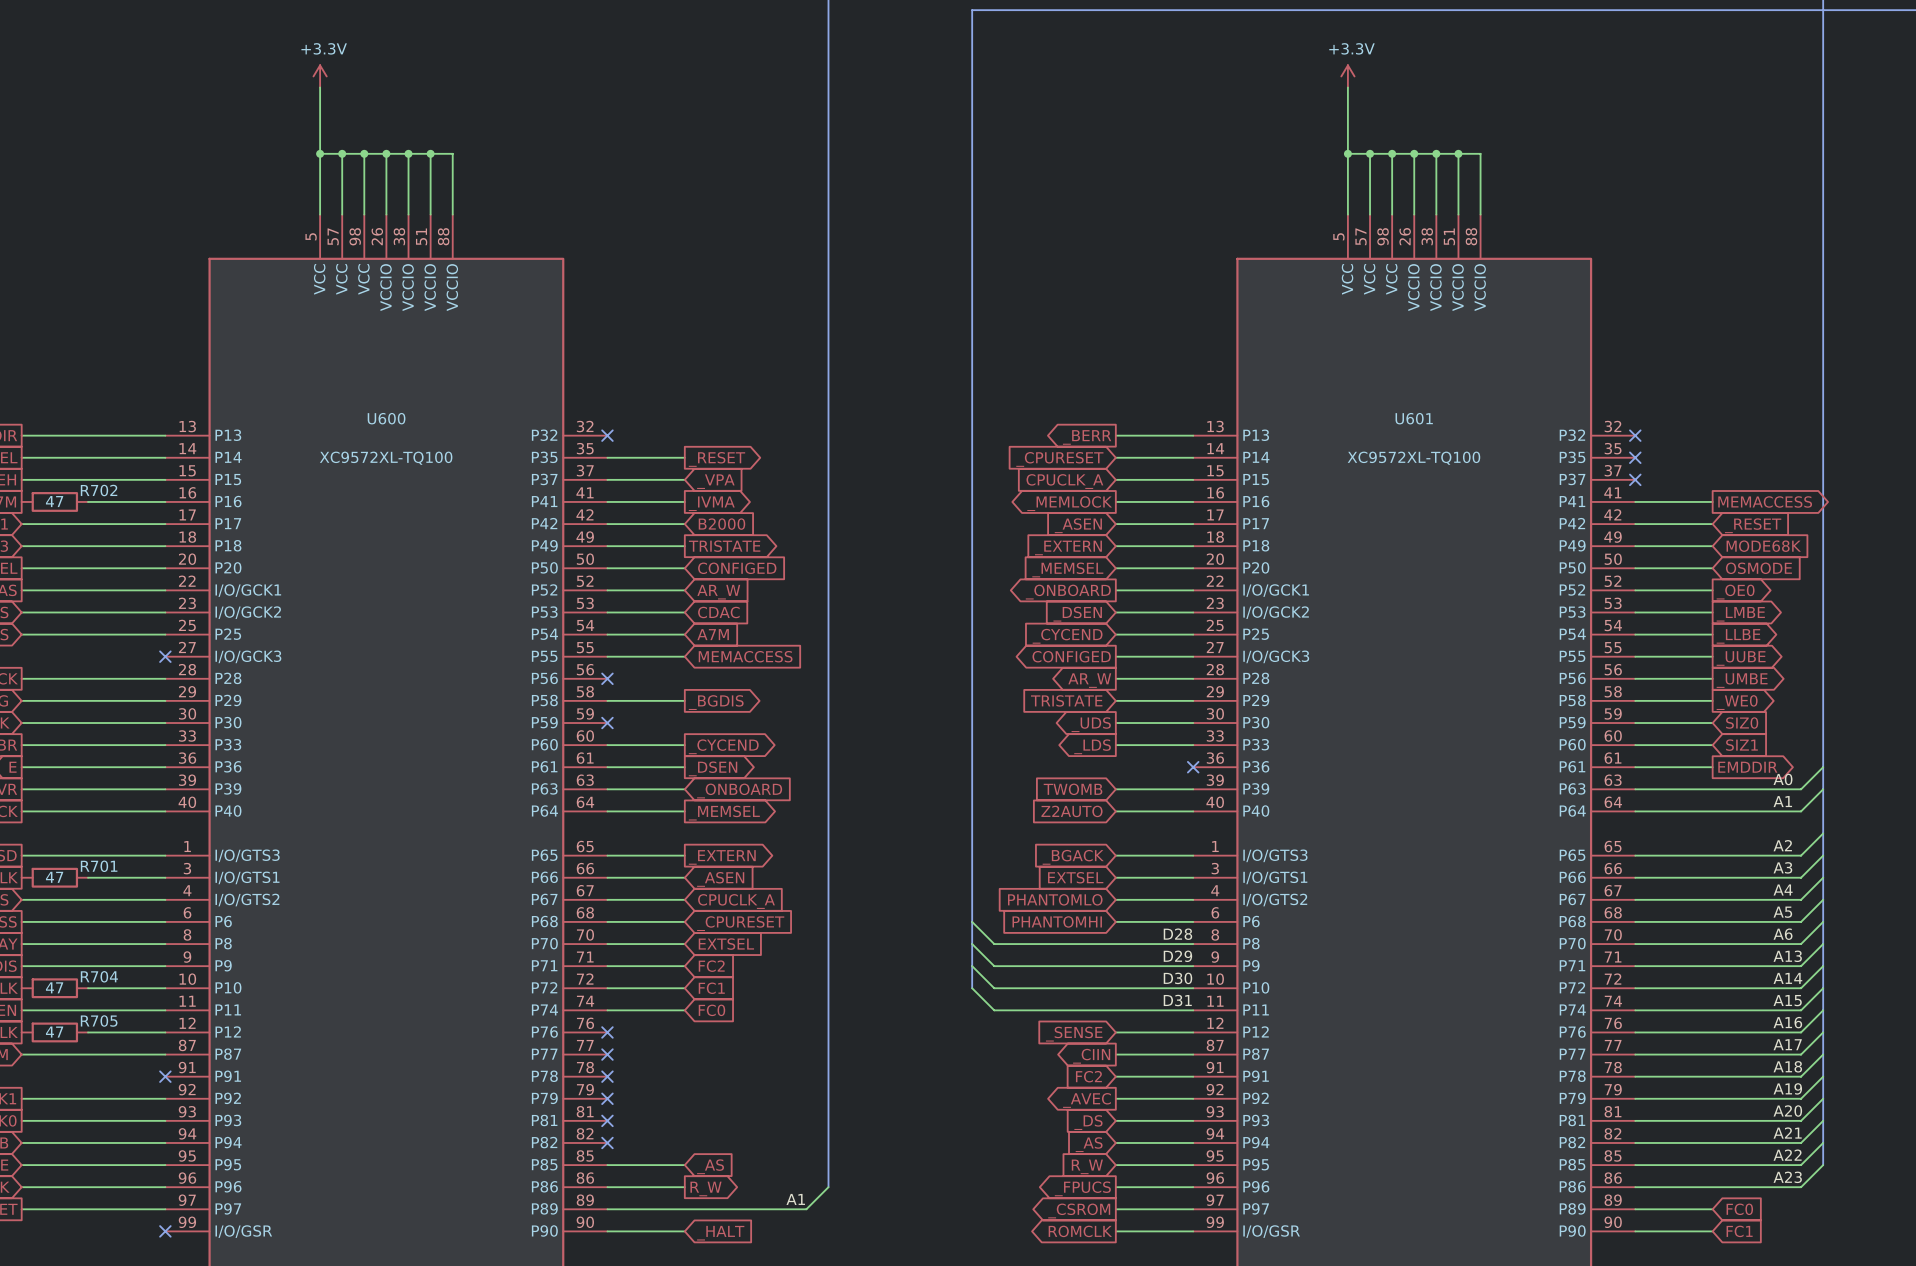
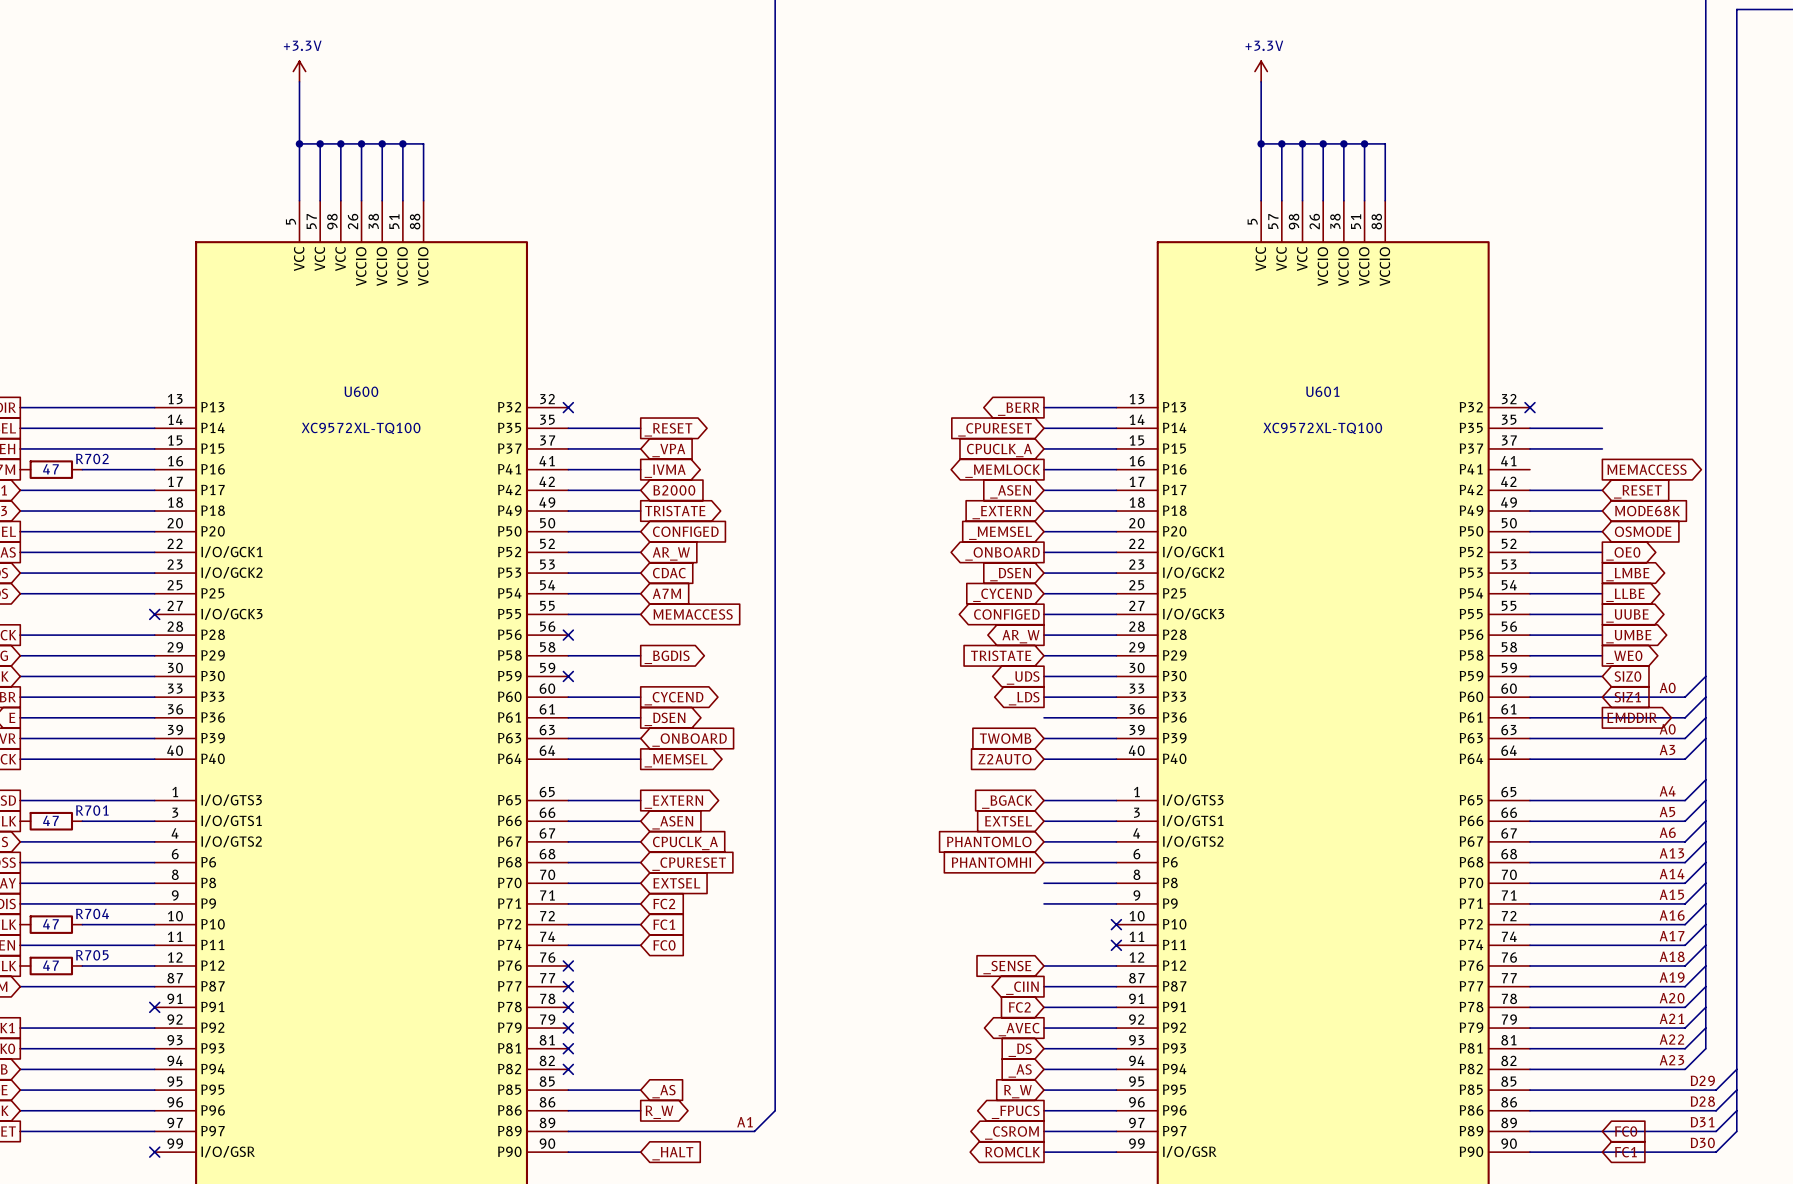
bus: (1856, 10) (972, 10) (972, 988) -> (1736, 9) (1736, 1131)
wire: none -> (1530, 428) (1602, 428)
no-connect mark: (1635, 457) -> none
no-connect mark: (1635, 479) -> none
wire: (1635, 501) (1712, 501) -> (1530, 448) (1602, 448)
wire: none -> (1705, 676) (1685, 697) (1602, 697)
label: none -> A0 (1667, 687)
wire: none -> (1705, 697) (1685, 717) (1602, 717)
wire: none -> (1044, 717) (1116, 717)
no-connect mark: (1193, 767) -> none
label: A1 (1782, 801) -> A3 (1667, 749)
label: A2 (1782, 845) -> A4 (1667, 791)
label: A3 (1782, 867) -> A5 (1667, 812)
label: A4 (1783, 889) -> A6 (1667, 832)
label: A5 (1782, 912) -> A13 (1671, 853)
wire: (972, 921) (994, 944) (1115, 944) -> none
label: D28 (1177, 934) -> none
label: A6 (1783, 934) -> A14 (1672, 874)
wire: (972, 944) (994, 966) (1115, 966) -> none
label: D29 (1177, 956) -> none
label: A13 (1787, 956) -> A15 (1671, 894)
wire: (972, 966) (994, 988) -> none
label: D30 (1177, 978) -> none
label: A14 (1787, 978) -> A16 (1672, 915)
wire: (972, 988) (994, 1010) (1193, 1010) -> none
wire: (994, 988) (1193, 988) -> none
no-connect mark: none -> (1116, 924)
label: D31 (1177, 1000) -> none
label: A15 (1787, 1000) -> A17 (1672, 936)
no-connect mark: none -> (1116, 945)
label: A16 (1787, 1022) -> A18 (1672, 956)
label: A17 (1787, 1044) -> A19 (1672, 977)
label: A18 (1787, 1066) -> A20 (1672, 998)
label: A19 (1787, 1088) -> A21 (1671, 1018)
label: A20 (1787, 1111) -> A22 (1671, 1039)
bus: (1823, 1120) (1823, 1165) -> none
label: A21 (1787, 1133) -> A23 (1671, 1060)
wire: (1823, 1142) (1801, 1165) -> (1736, 1069) (1716, 1090) (1685, 1090)
label: A22 (1787, 1155) -> none
label: none -> D29 (1702, 1080)
wire: (1823, 1165) (1801, 1187) -> (1736, 1090) (1716, 1110) (1685, 1110)
label: A23 (1787, 1177) -> none
label: none -> D28 (1702, 1101)
wire: none -> (1736, 1110) (1716, 1131) (1602, 1131)
label: none -> D31 (1702, 1122)
wire: none -> (1736, 1131) (1716, 1152) (1602, 1152)
label: none -> D30 (1702, 1142)

